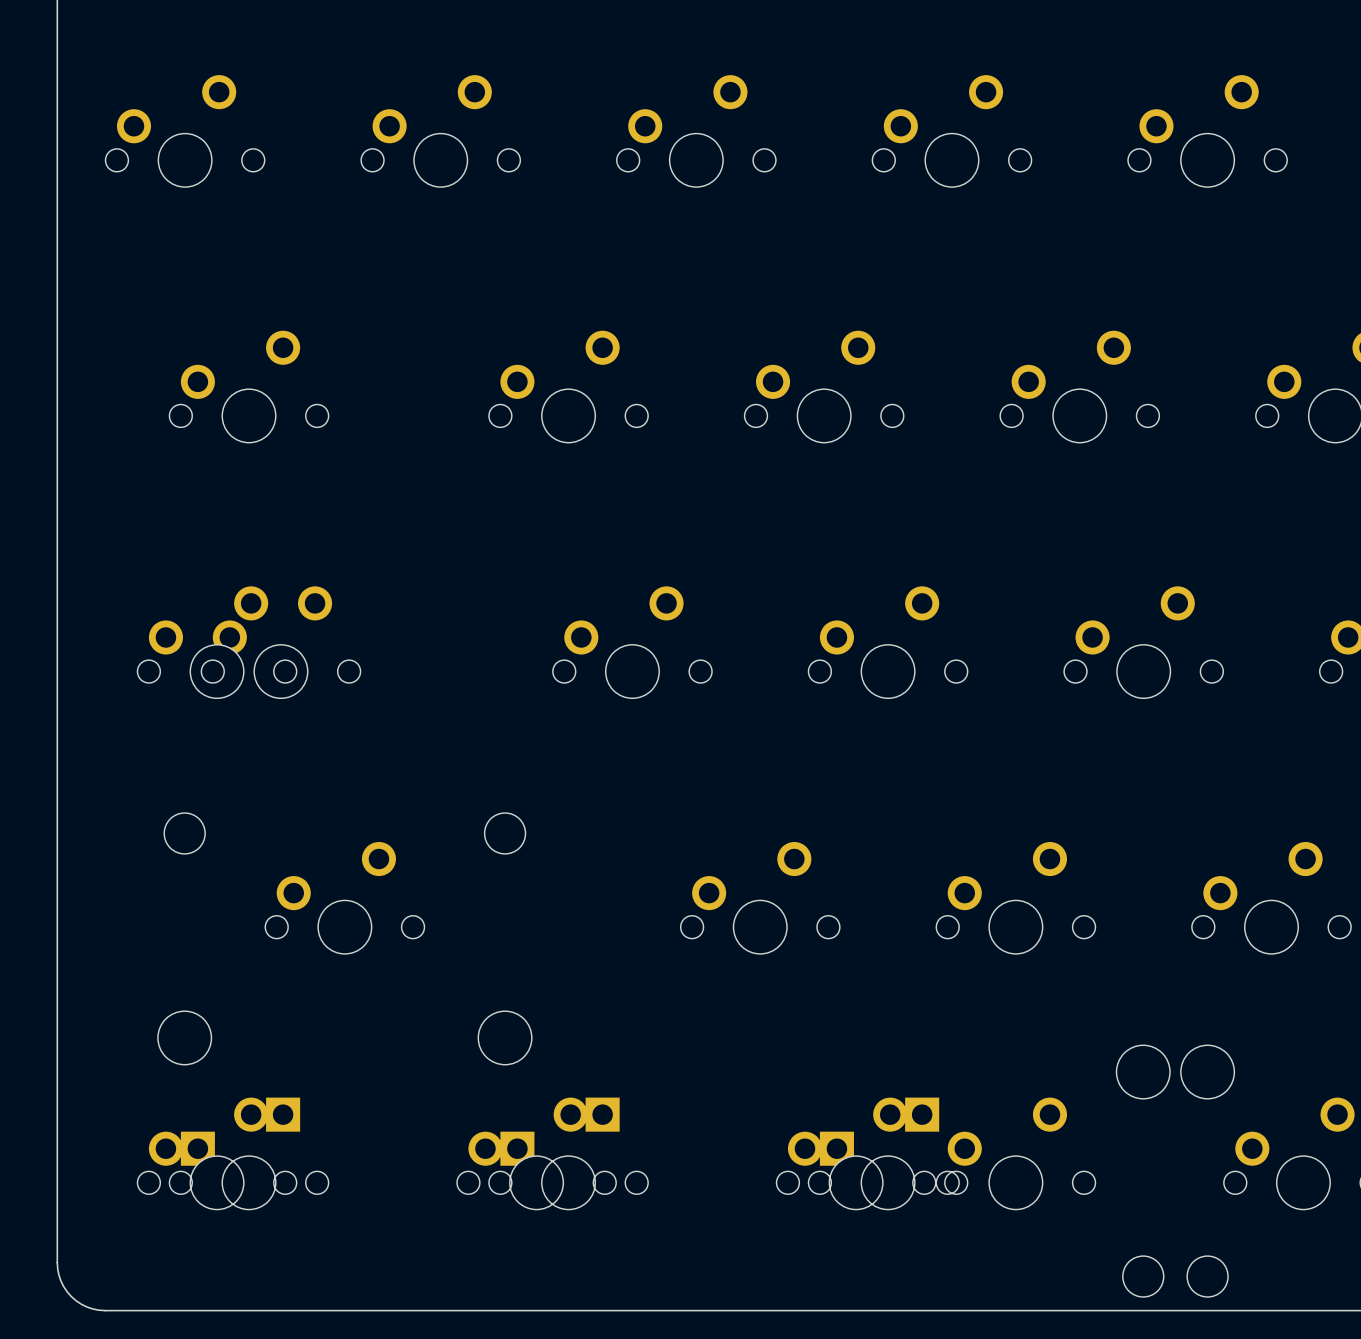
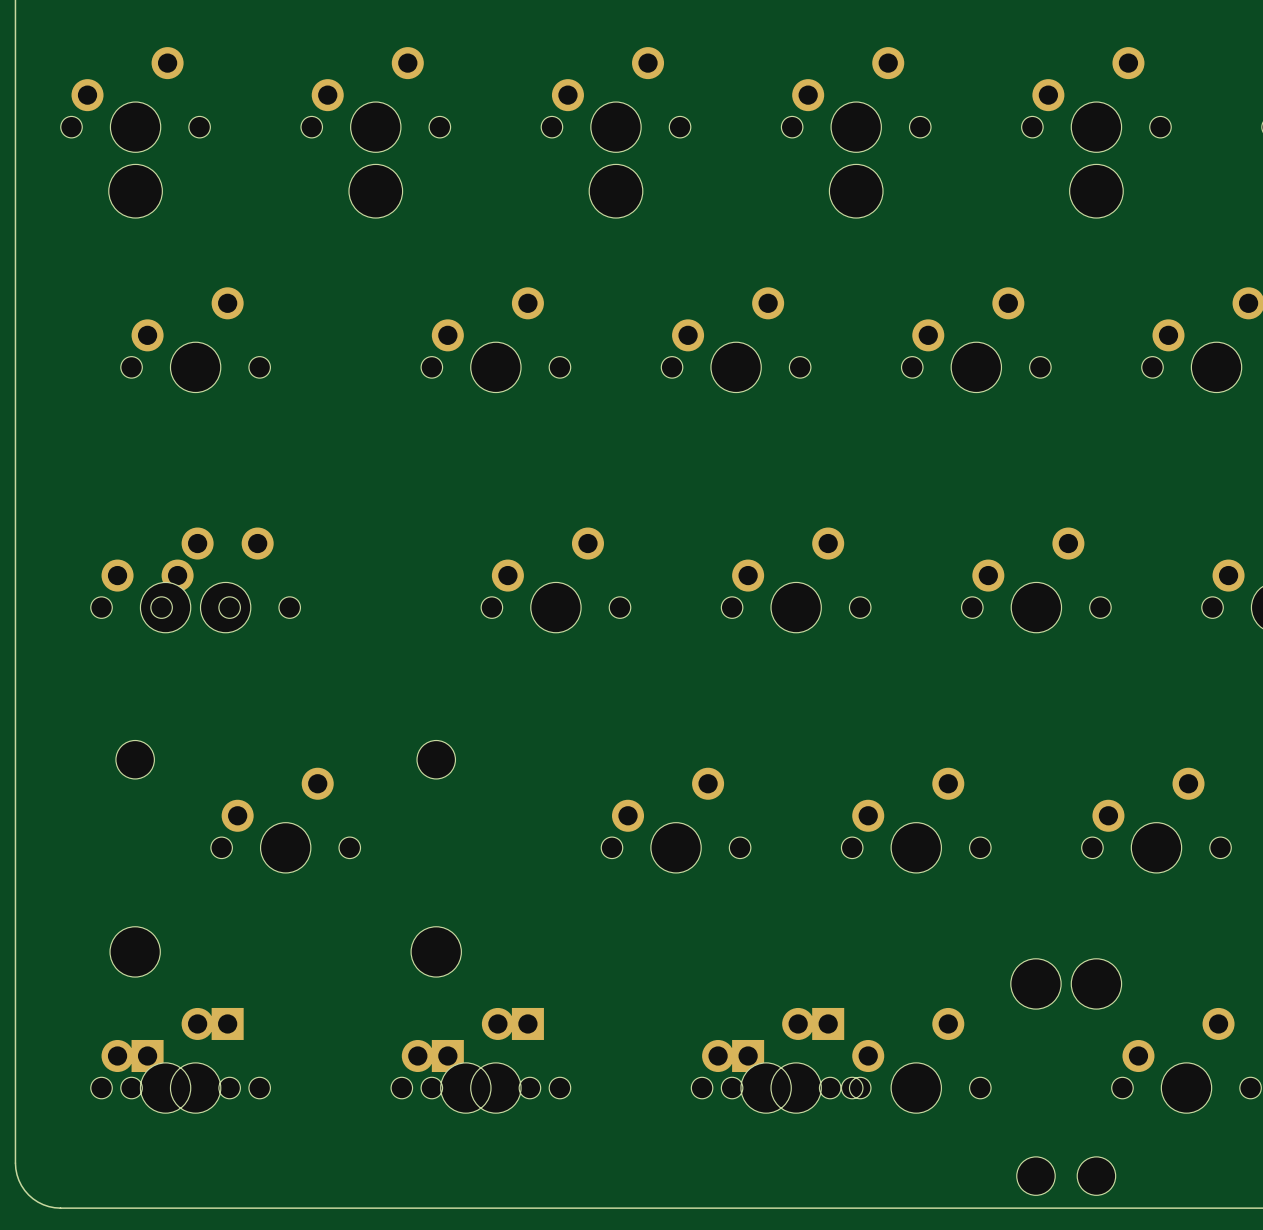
part: none -> (135, 191)
part: none -> (375, 191)
part: none -> (616, 191)
part: none -> (856, 191)
part: none -> (1096, 191)

